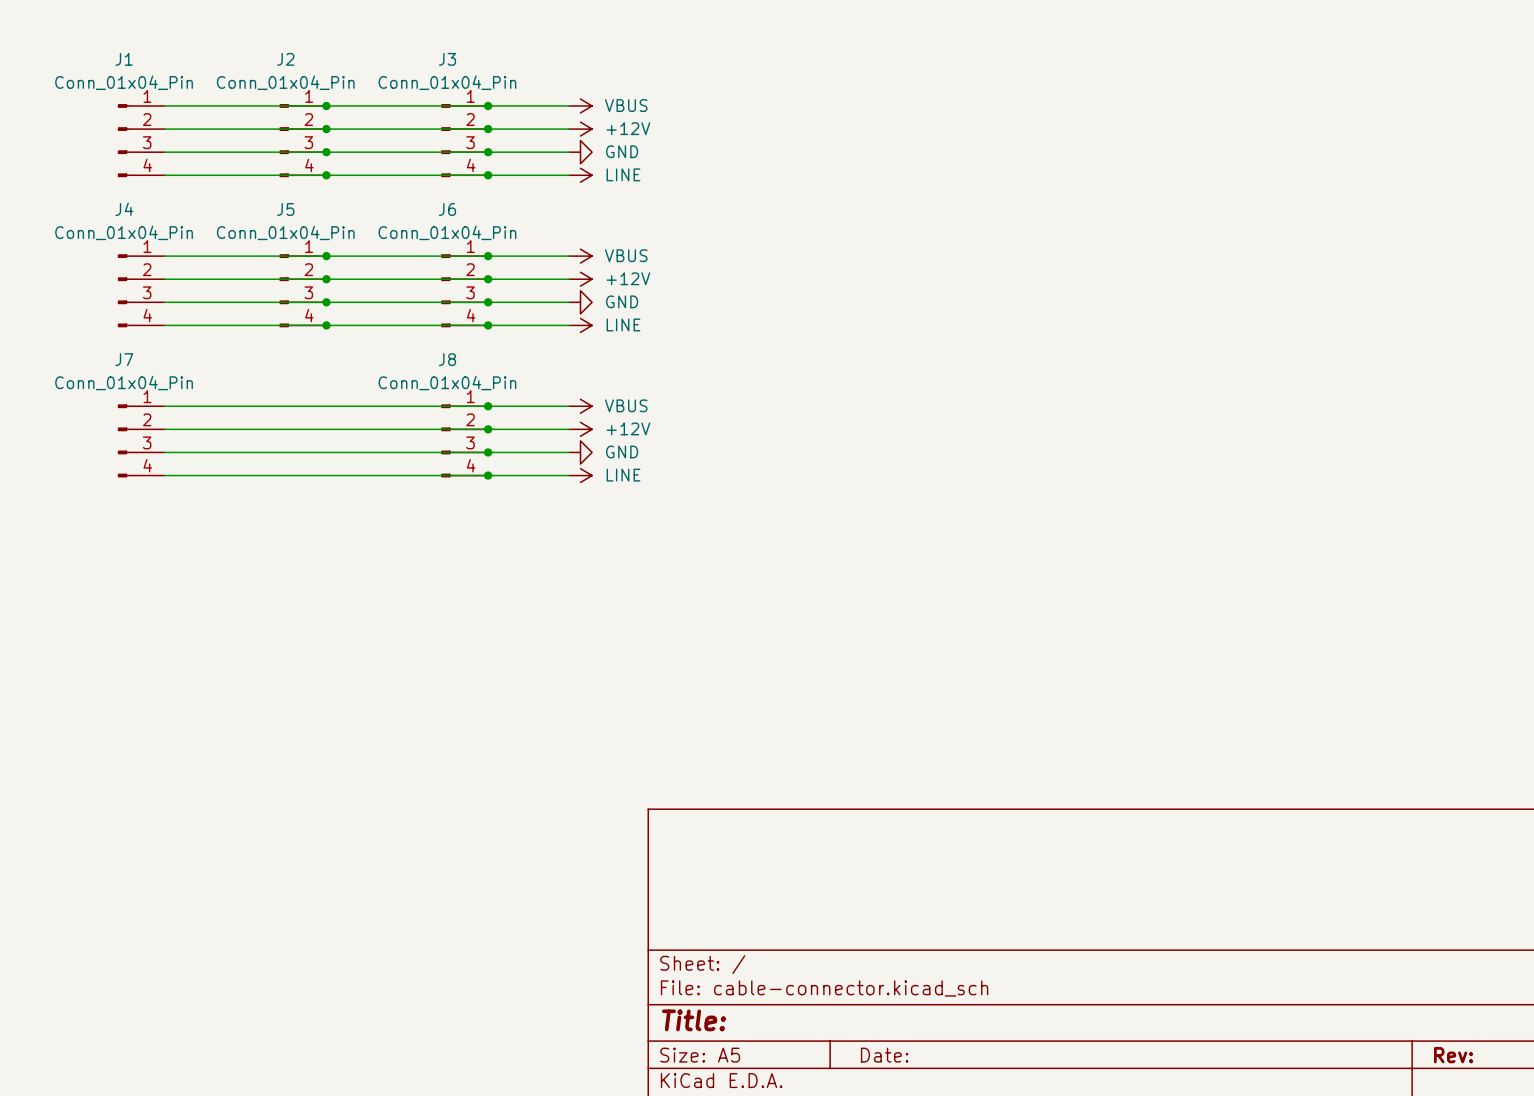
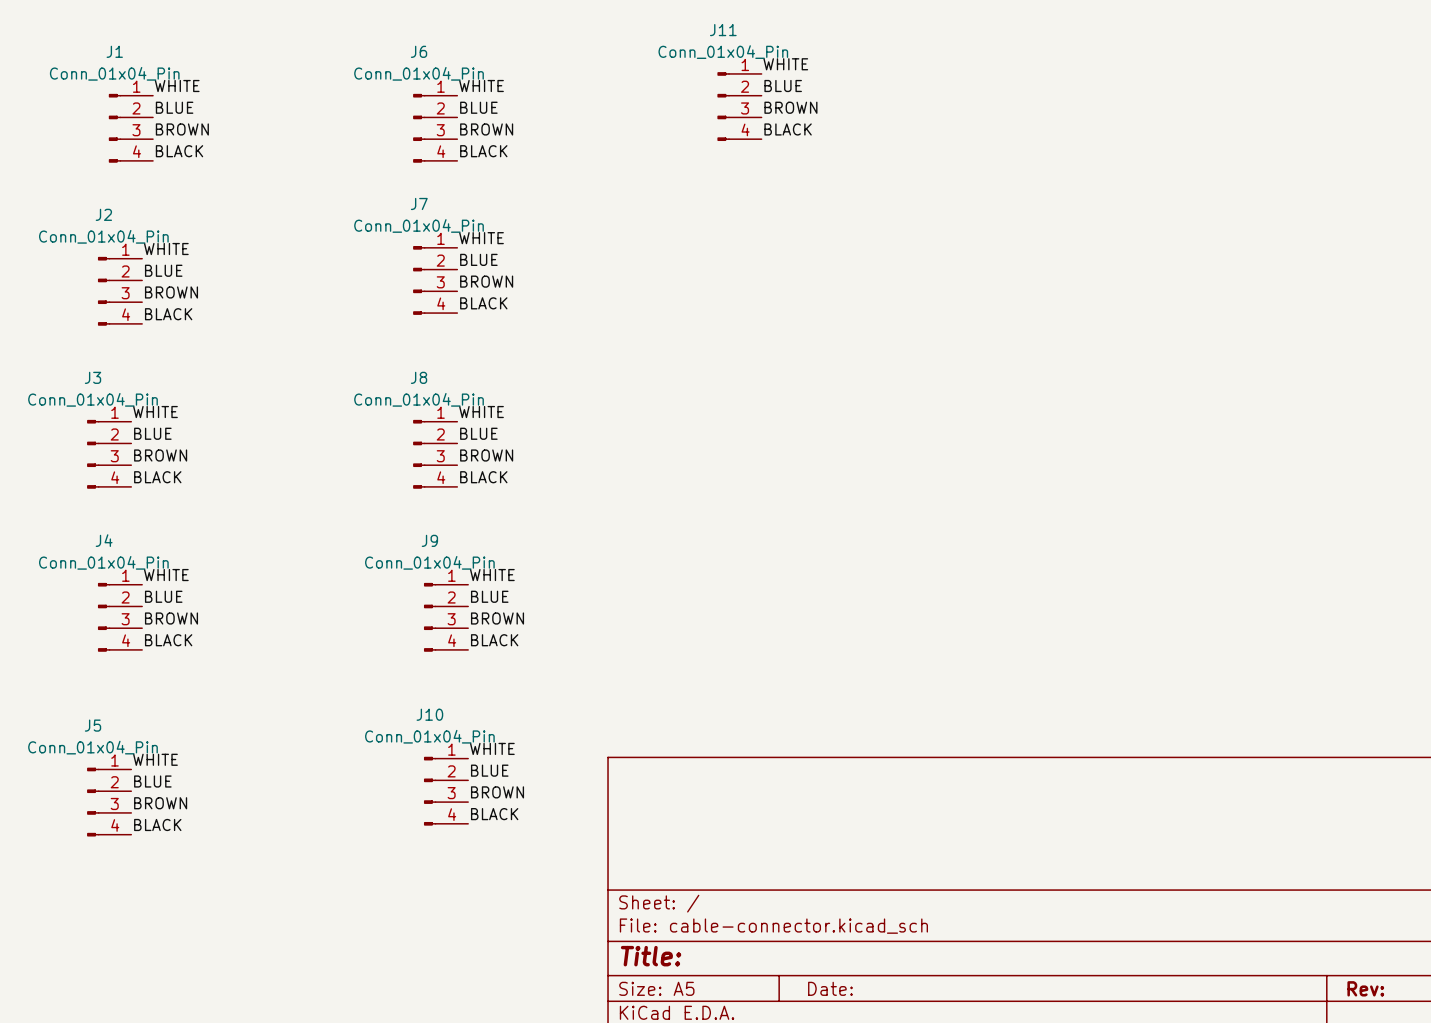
J3 name: J3 (447, 59) -> J6 (419, 51)
label: none -> WHITE (785, 64)
label: none -> WHITE (177, 86)
label: none -> WHITE (481, 86)
label: none -> BLUE (783, 86)
wire: (164, 105) (568, 105) -> none
junction: (326, 105) -> none
junction: (488, 105) -> none
power symbol: VBUS (580, 105) -> none
J11: none -> Conn_01x04_Pin (739, 106)
label: none -> BLUE (174, 107)
label: none -> BLUE (478, 107)
label: none -> BROWN (790, 107)
wire: (164, 129) (568, 129) -> none
junction: (326, 129) -> none
junction: (488, 129) -> none
power symbol: +12V (580, 129) -> none
J2 position: (302, 140) -> (120, 291)
label: none -> BROWN (182, 129)
label: none -> BROWN (486, 129)
label: none -> BLACK (788, 129)
wire: (164, 152) (568, 152) -> none
junction: (326, 152) -> none
junction: (488, 152) -> none
power symbol: GND (580, 152) -> none
label: none -> BLACK (179, 151)
label: none -> BLACK (483, 151)
wire: (164, 175) (568, 175) -> none
junction: (326, 175) -> none
junction: (488, 175) -> none
power symbol: LINE (580, 175) -> none
wire: (164, 256) (568, 256) -> none
junction: (326, 256) -> none
junction: (488, 256) -> none
power symbol: VBUS (580, 256) -> none
label: none -> WHITE (481, 238)
label: none -> WHITE (166, 249)
wire: (164, 279) (568, 279) -> none
junction: (326, 279) -> none
junction: (488, 279) -> none
power symbol: +12V (580, 279) -> none
label: none -> BLUE (478, 259)
J4 position: (141, 290) -> (120, 617)
J5 position: (302, 290) -> (109, 802)
J6: Conn_01x04_Pin (464, 290) -> none
label: none -> BLUE (163, 270)
wire: (164, 302) (568, 302) -> none
junction: (326, 302) -> none
junction: (488, 302) -> none
power symbol: GND (580, 302) -> none
label: none -> BROWN (486, 281)
label: none -> BROWN (171, 292)
wire: (164, 325) (568, 325) -> none
junction: (326, 325) -> none
junction: (488, 325) -> none
power symbol: LINE (580, 325) -> none
label: none -> BLACK (483, 303)
label: none -> BLACK (168, 314)
wire: (164, 406) (568, 406) -> none
junction: (488, 406) -> none
power symbol: VBUS (580, 406) -> none
wire: (164, 429) (568, 429) -> none
junction: (488, 429) -> none
power symbol: +12V (580, 429) -> none
J7 position: (141, 440) -> (435, 280)
J8 position: (464, 440) -> (435, 454)
label: none -> WHITE (155, 412)
label: none -> WHITE (481, 412)
wire: (164, 452) (568, 452) -> none
junction: (488, 452) -> none
power symbol: GND (580, 452) -> none
label: none -> BLUE (152, 433)
label: none -> BLUE (478, 433)
wire: (164, 475) (568, 475) -> none
junction: (488, 475) -> none
power symbol: LINE (580, 475) -> none
J3: none -> Conn_01x04_Pin (109, 454)
label: none -> BROWN (160, 455)
label: none -> BROWN (486, 455)
label: none -> BLACK (157, 477)
label: none -> BLACK (483, 477)
label: none -> WHITE (166, 575)
label: none -> WHITE (492, 575)
label: none -> BLUE (163, 596)
label: none -> BLUE (489, 596)
J9: none -> Conn_01x04_Pin (446, 617)
label: none -> BROWN (171, 618)
label: none -> BROWN (497, 618)
label: none -> BLACK (168, 640)
label: none -> BLACK (494, 640)
label: none -> WHITE (492, 748)
label: none -> WHITE (155, 759)
label: none -> BLUE (489, 770)
label: none -> BLUE (152, 781)
J10: none -> Conn_01x04_Pin (446, 791)
label: none -> BROWN (497, 792)
label: none -> BROWN (160, 803)
label: none -> BLACK (494, 814)
label: none -> BLACK (157, 824)

